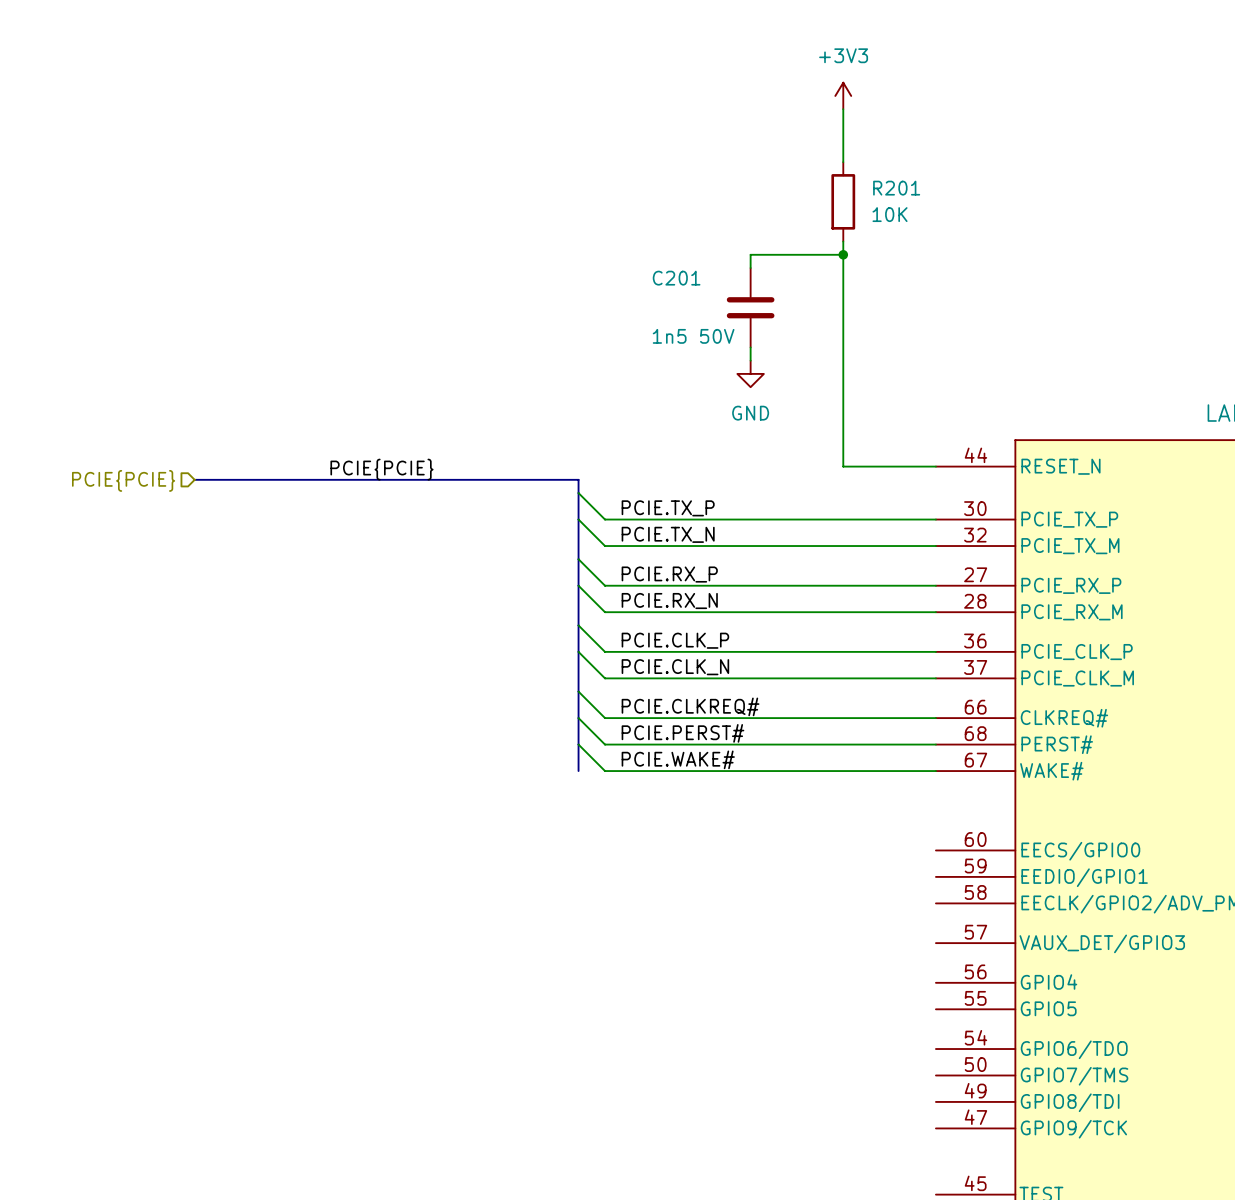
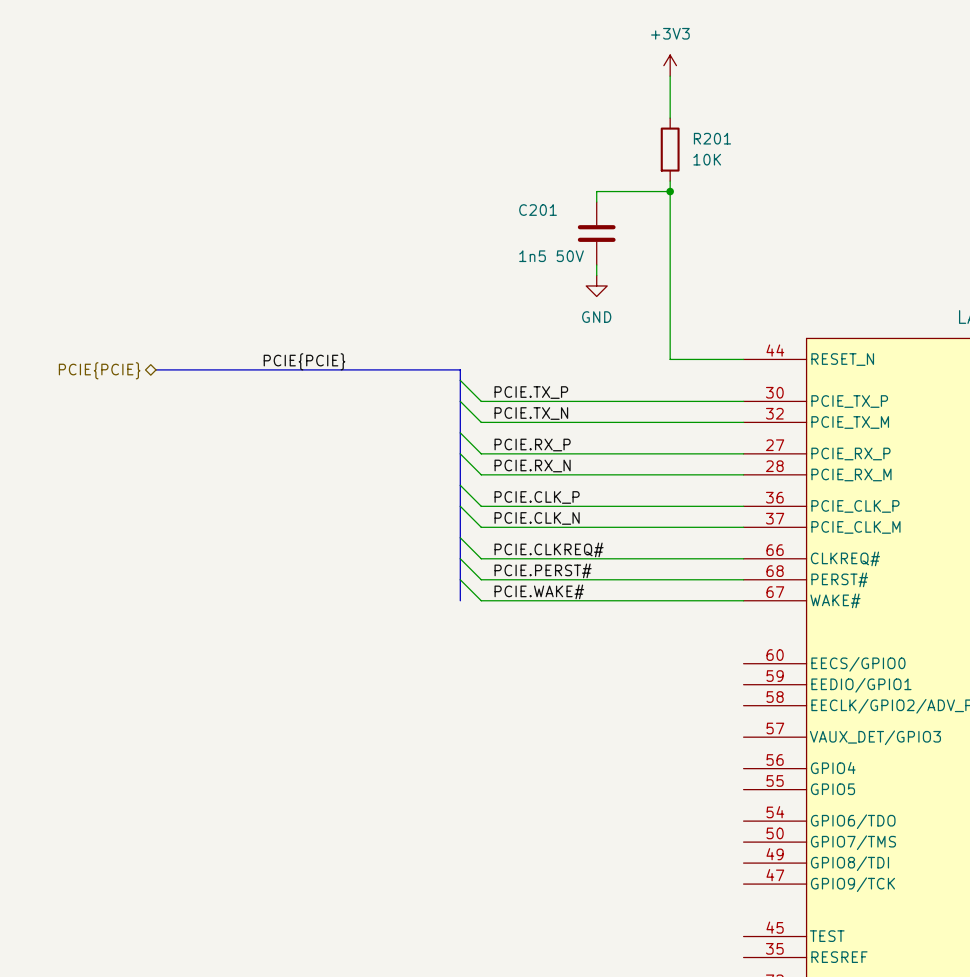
hierarchical label shape: input (123, 480) -> bidirectional (99, 370)

